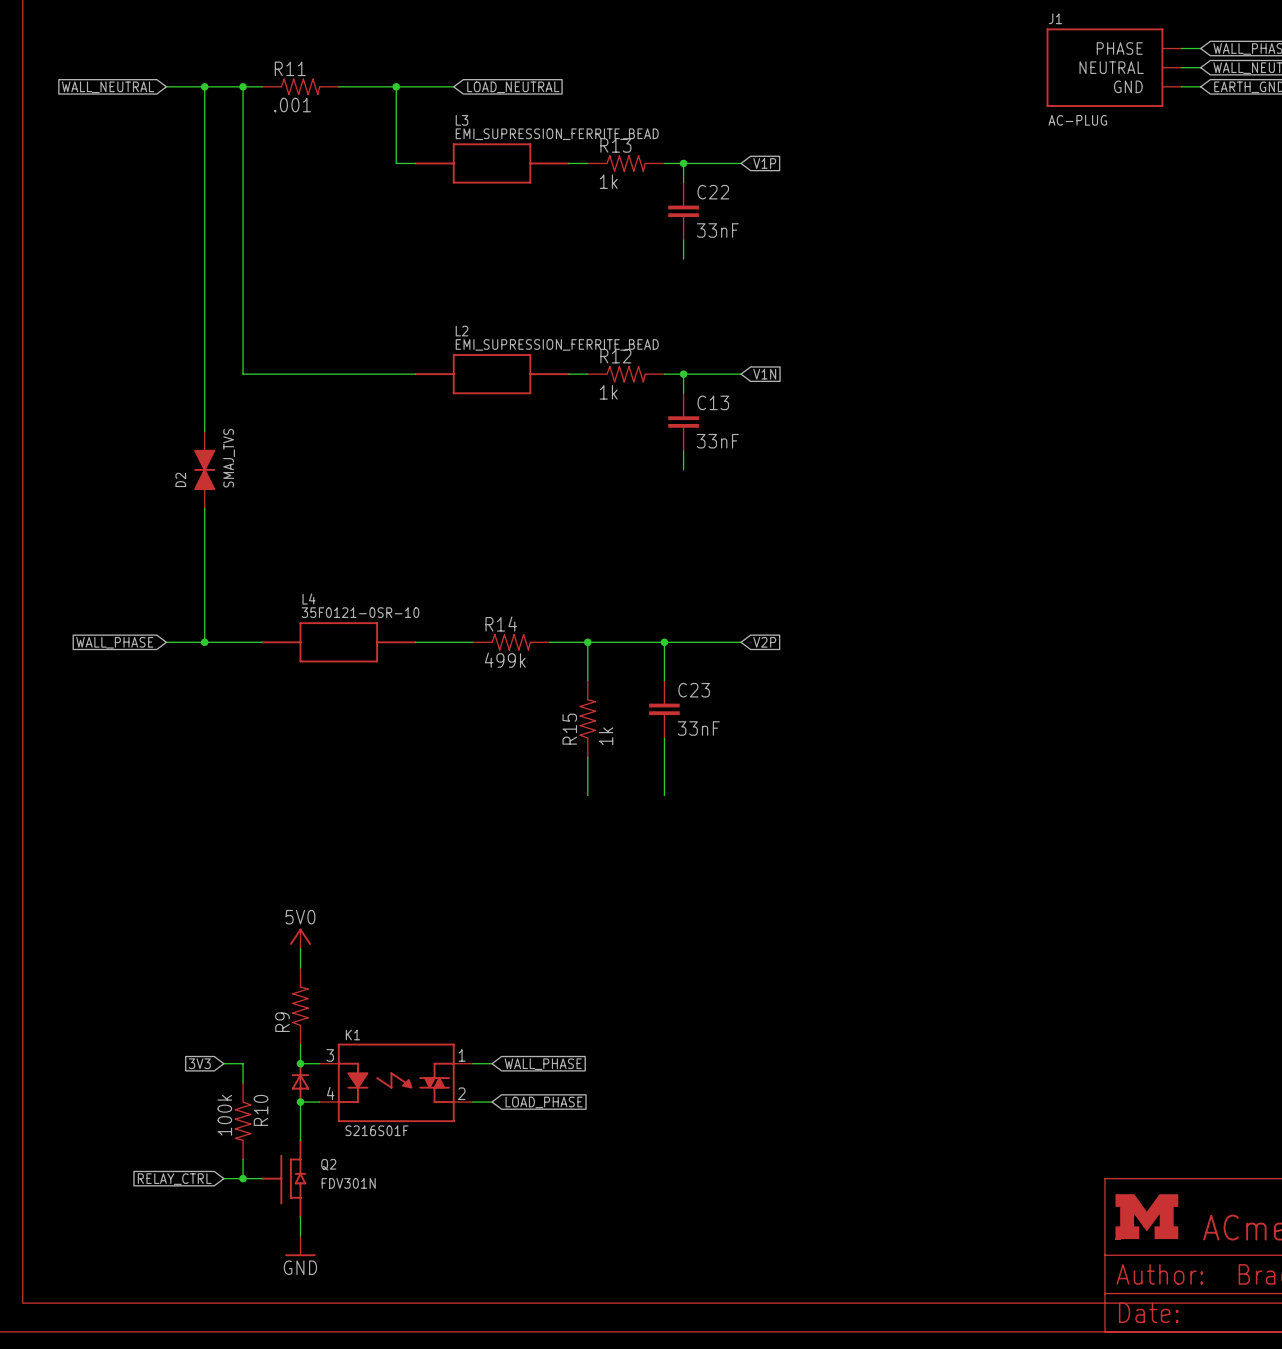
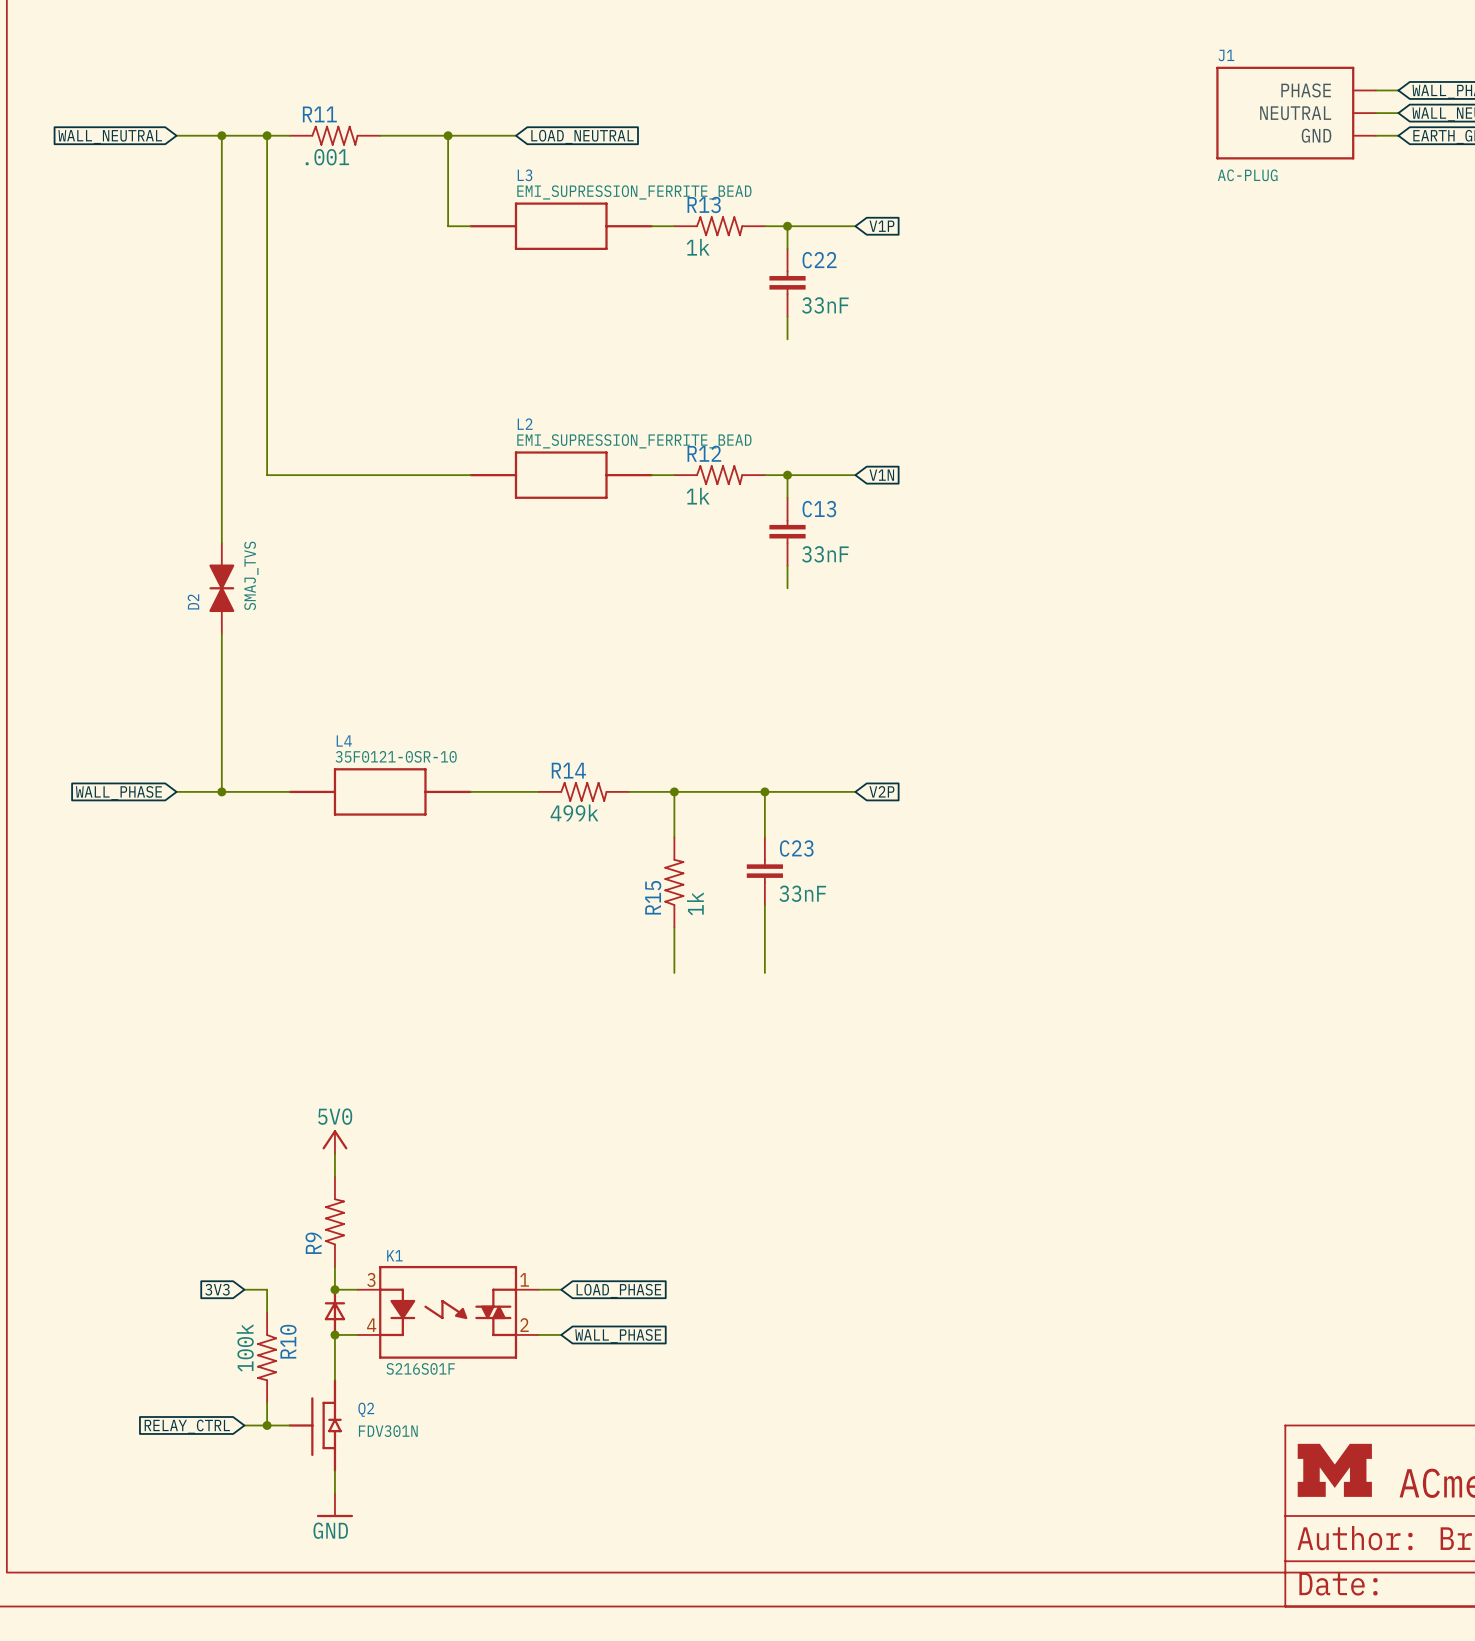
global label: WALL_PHASE (543, 1064) -> LOAD_PHASE (618, 1290)
global label: LOAD_PHASE (544, 1102) -> WALL_PHASE (618, 1336)

